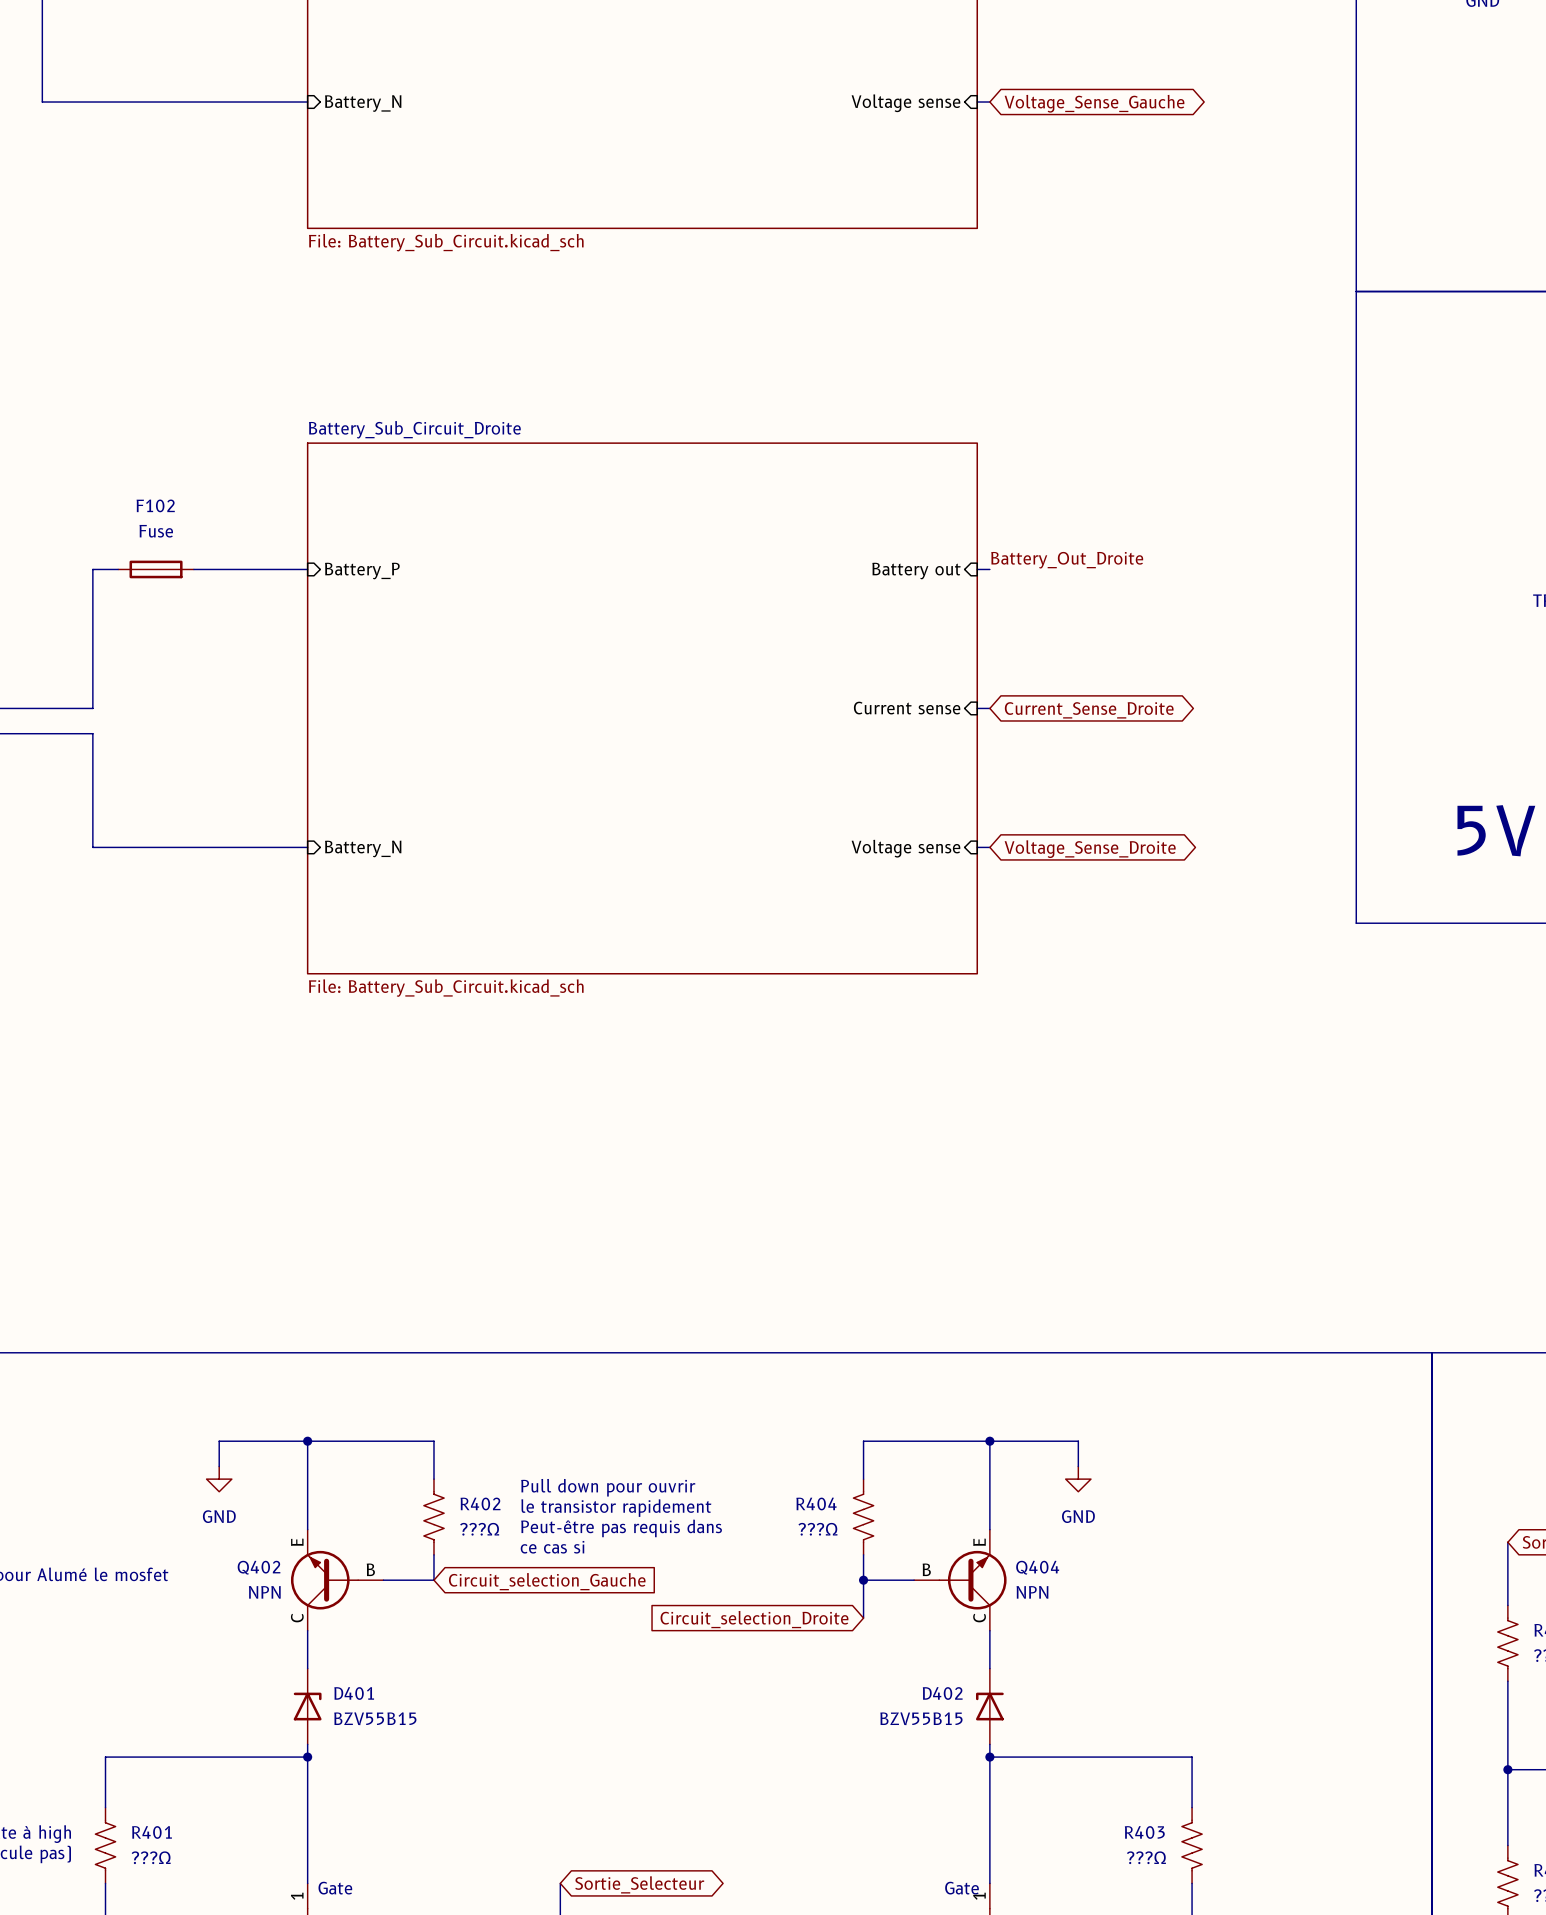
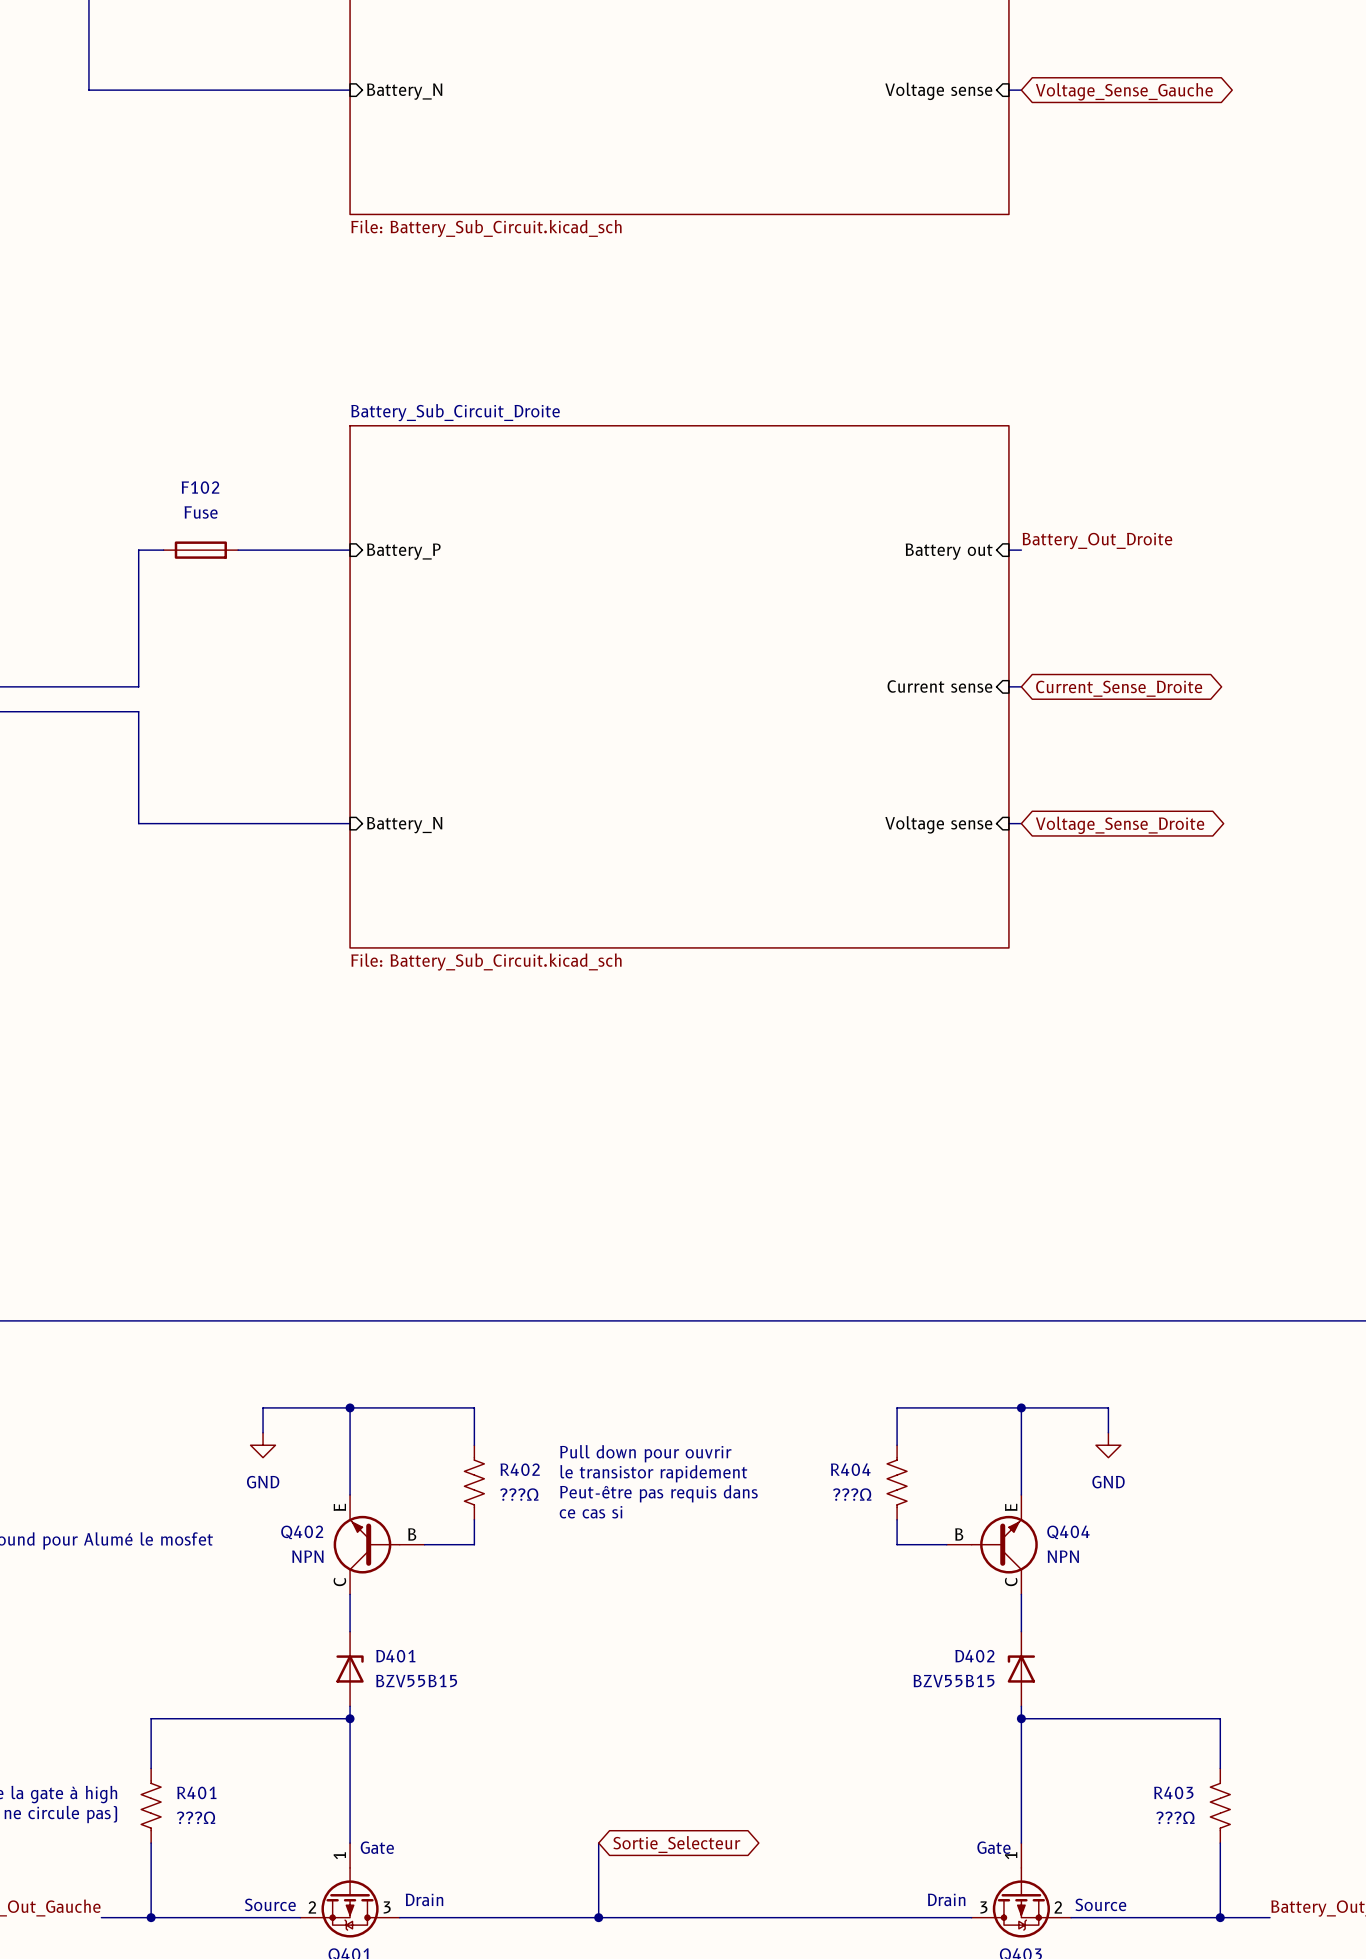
wire: (863, 1580) (863, 1618) -> none
junction: (863, 1580) -> none
global label: Circuit_selection_Gauche (547, 1581) -> none
global label: Circuit_selection_Droite (754, 1619) -> none

